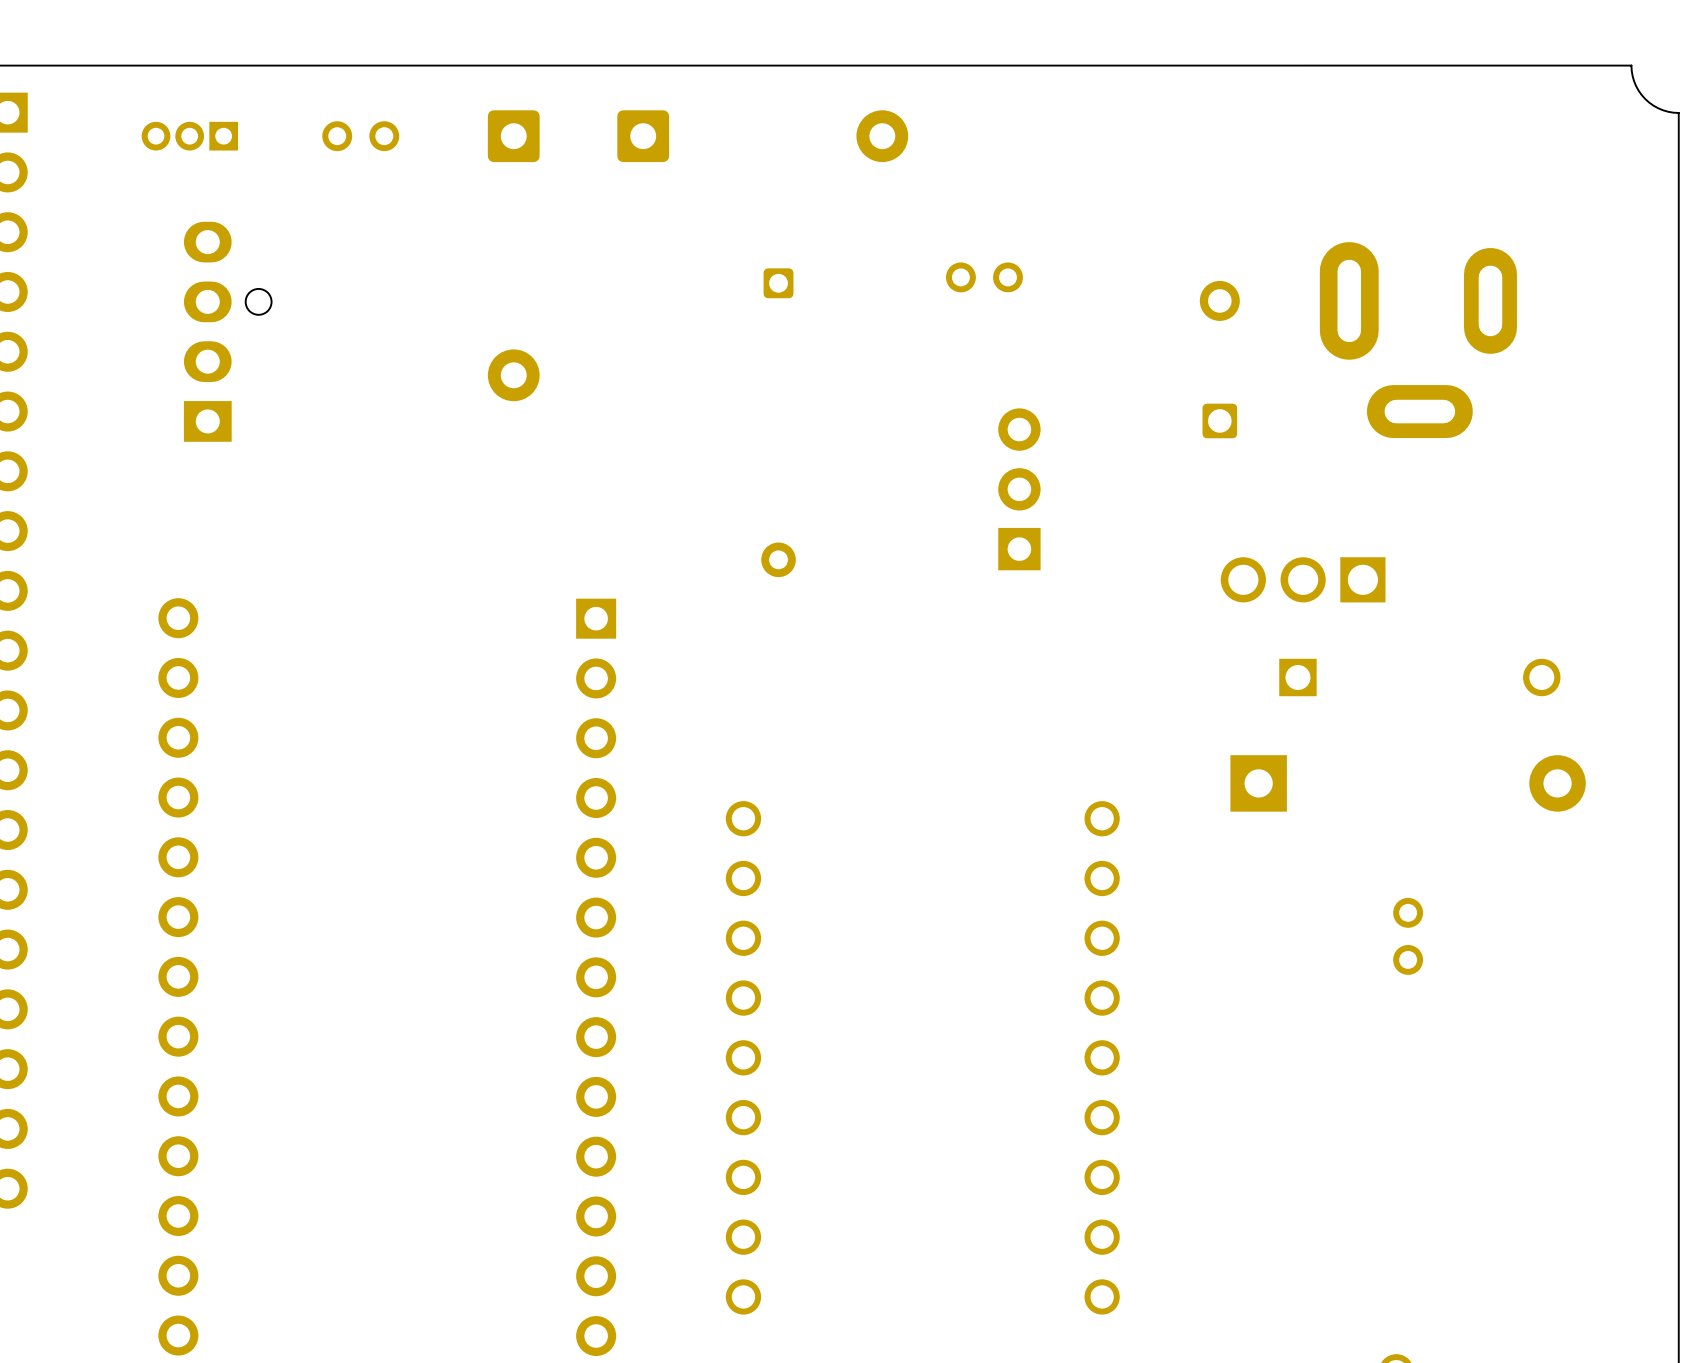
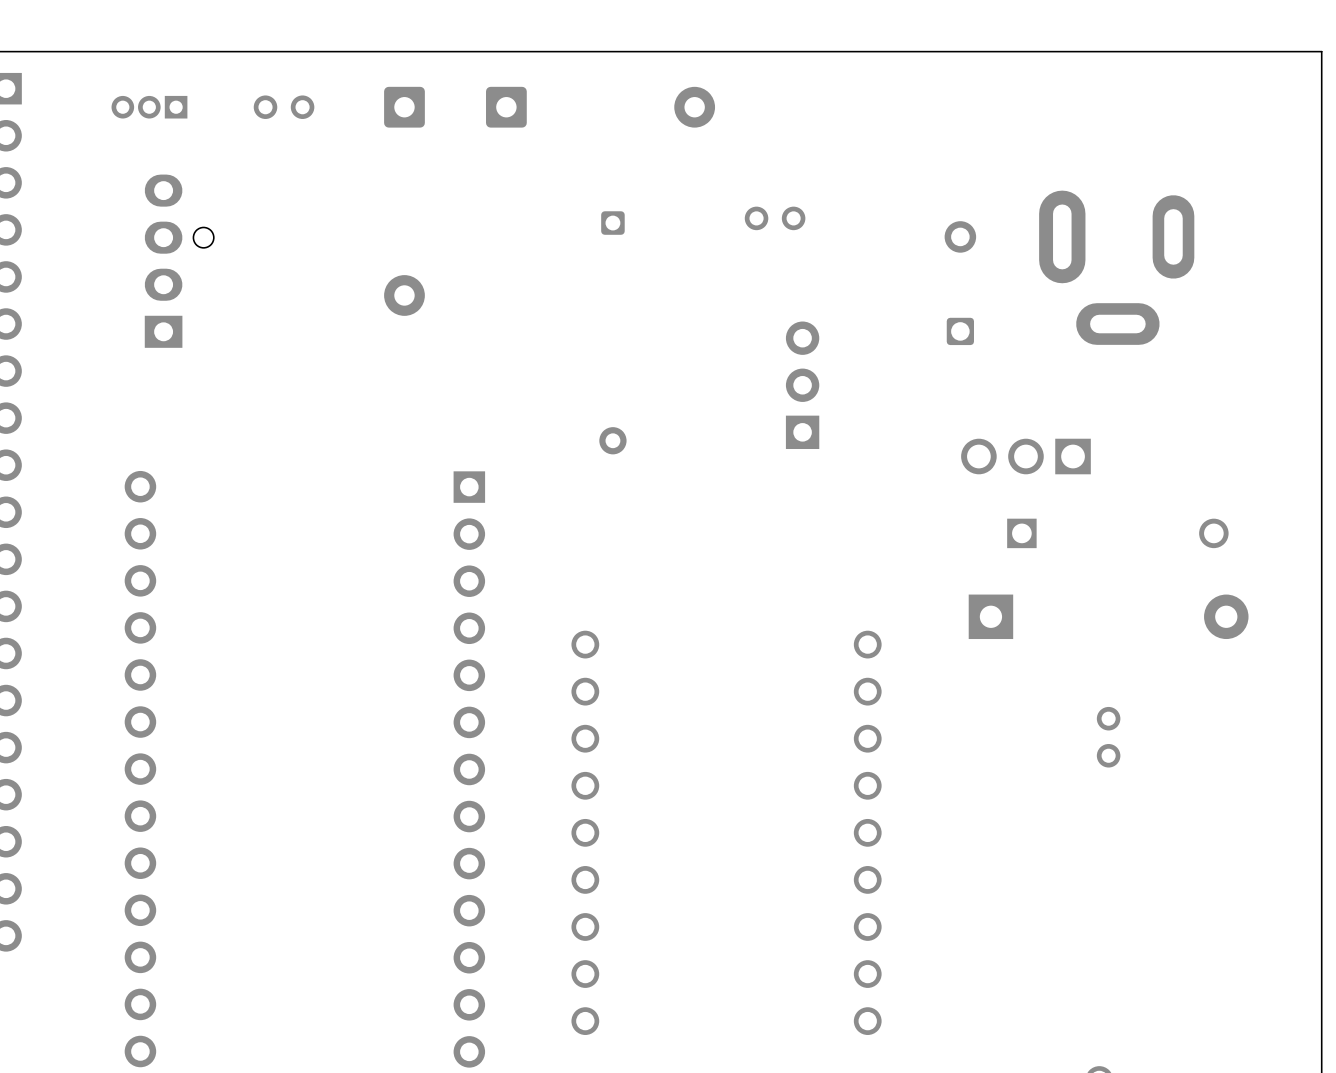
board edge: (1631, 65) (1636, 86) (1645, 99) (1663, 110) (1678, 112) -> (1284, 51) (1321, 51) (1321, 88)

